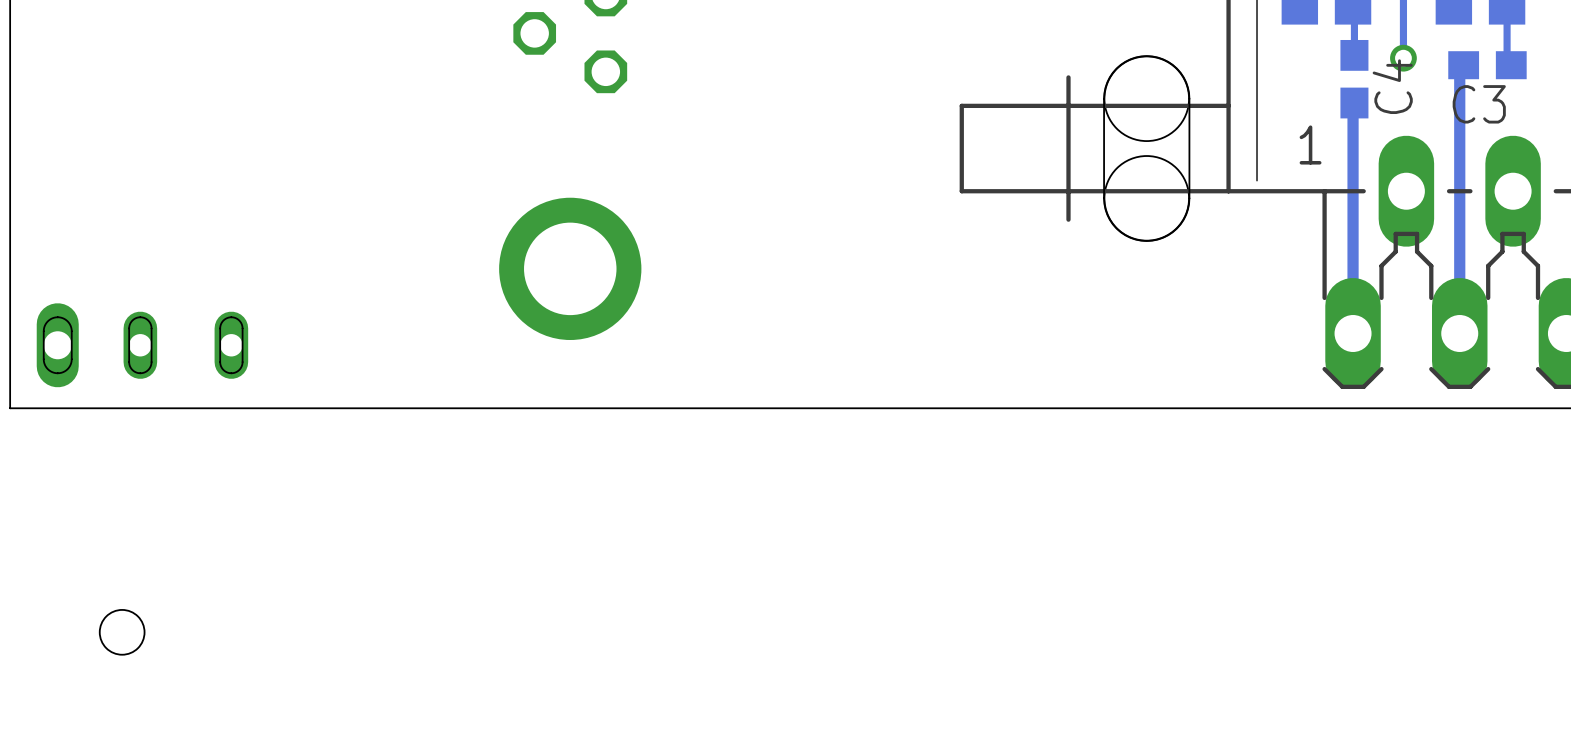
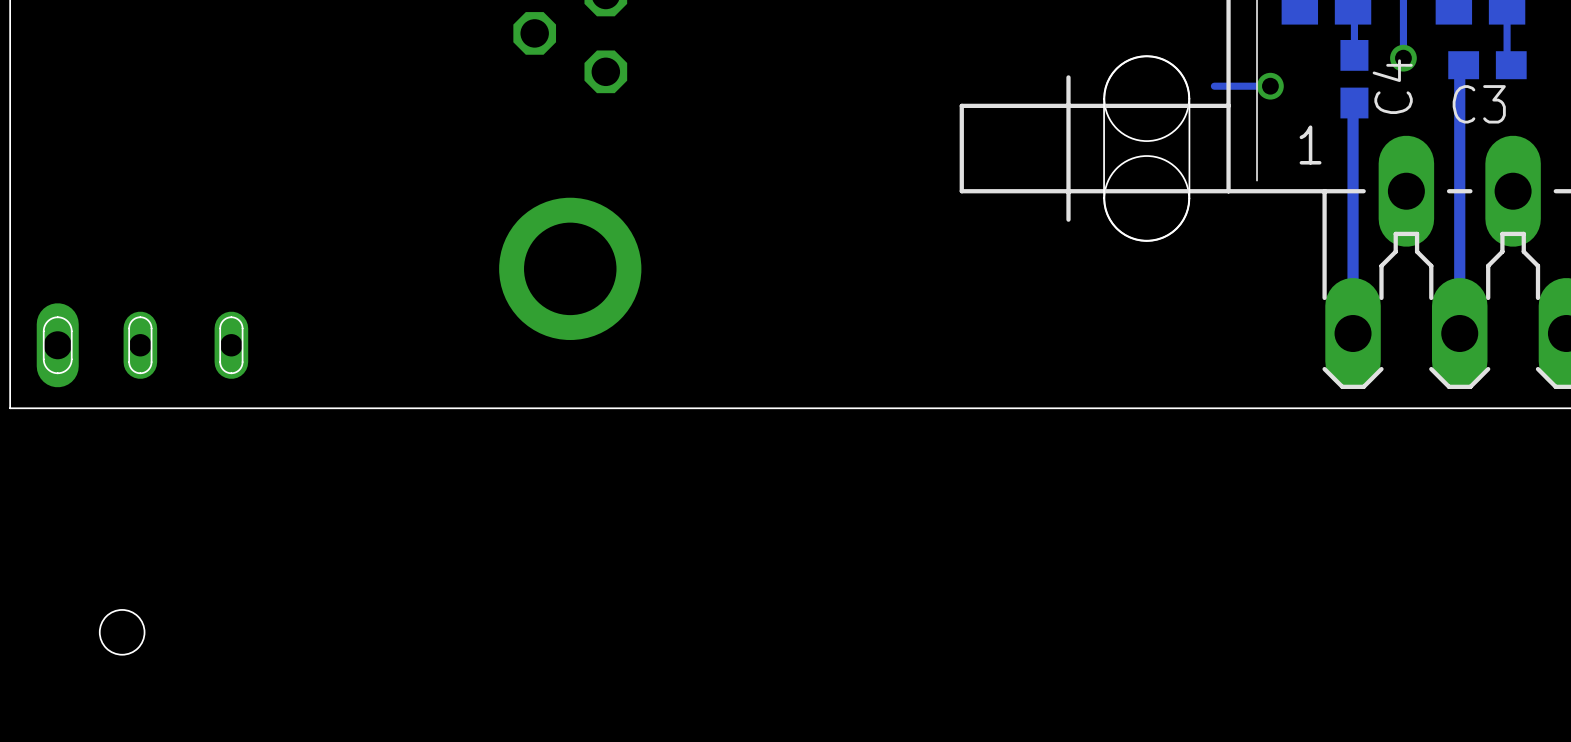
track: none -> (1270, 86) (1214, 86)
via: none -> (1270, 86)

